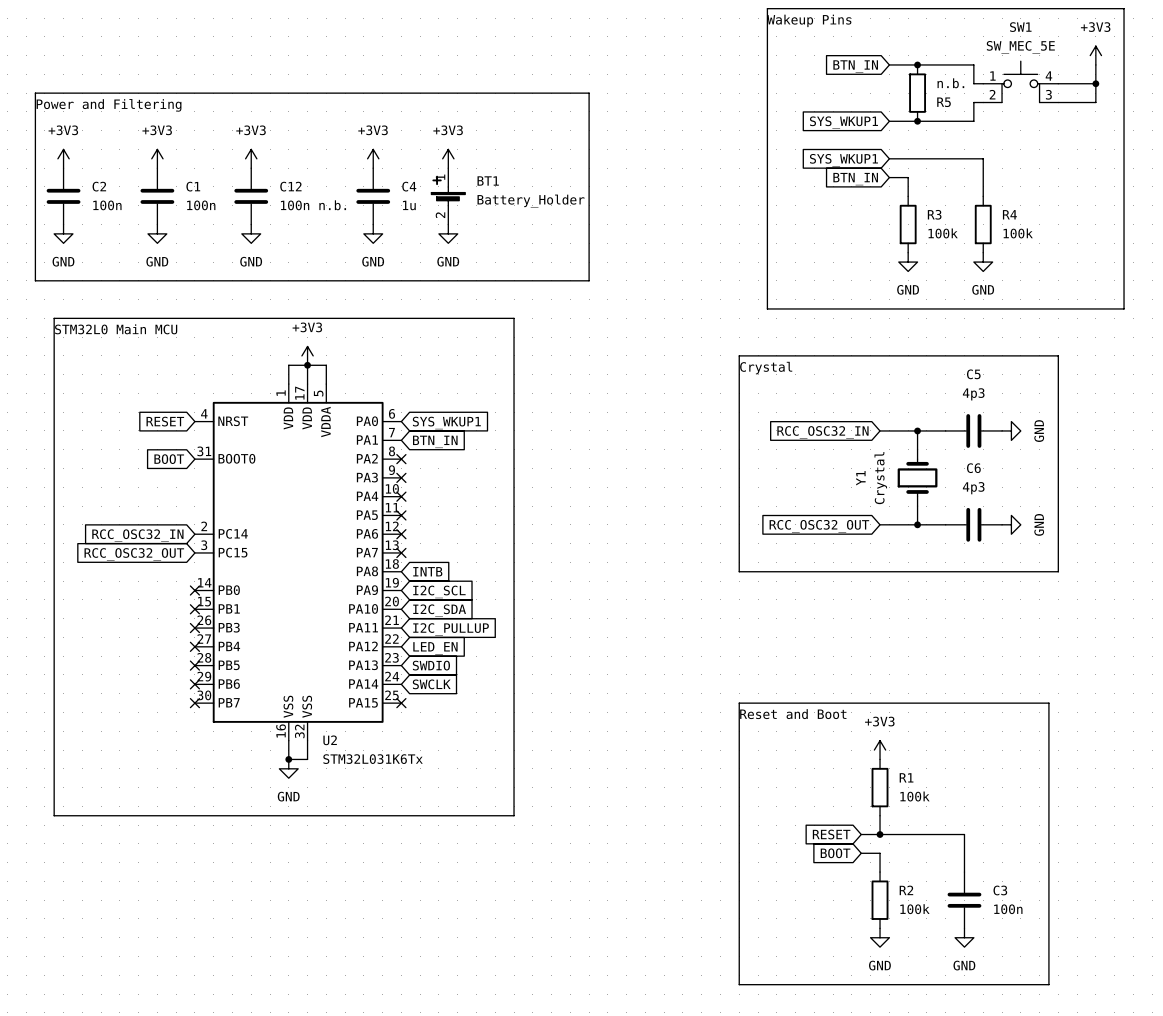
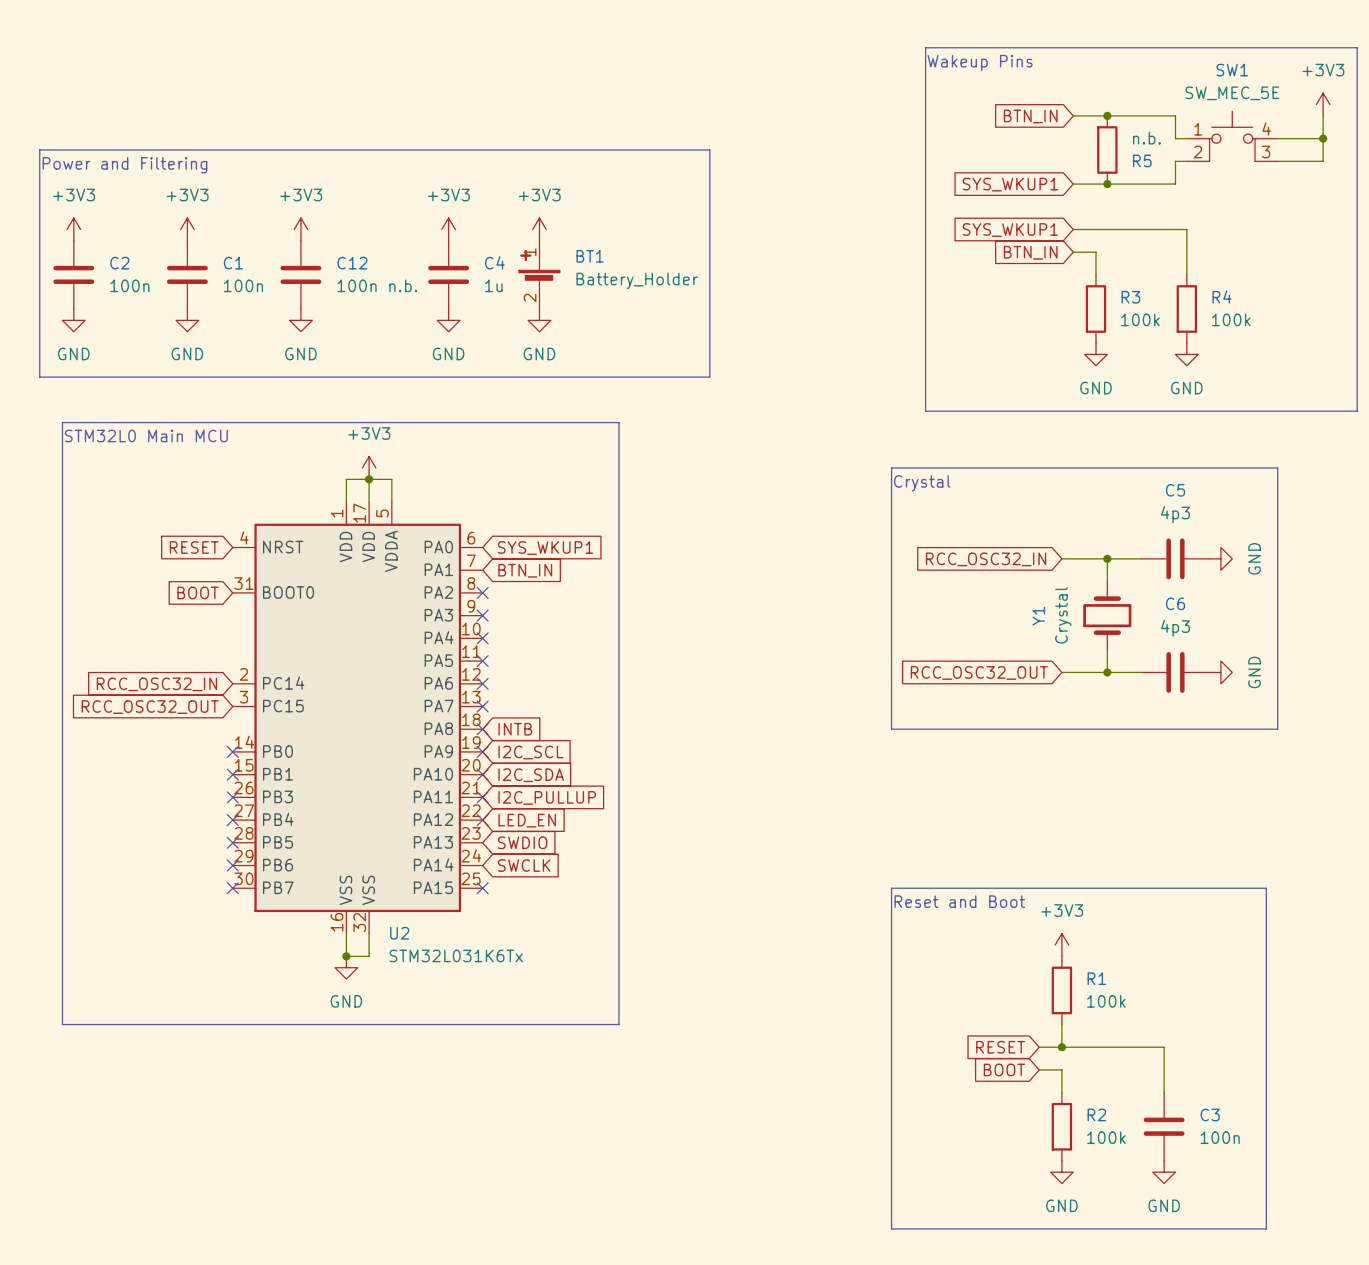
no-connect mark: none -> (482, 729)
no-connect mark: none -> (482, 751)
no-connect mark: none -> (482, 774)
no-connect mark: none -> (482, 797)
no-connect mark: none -> (482, 820)

